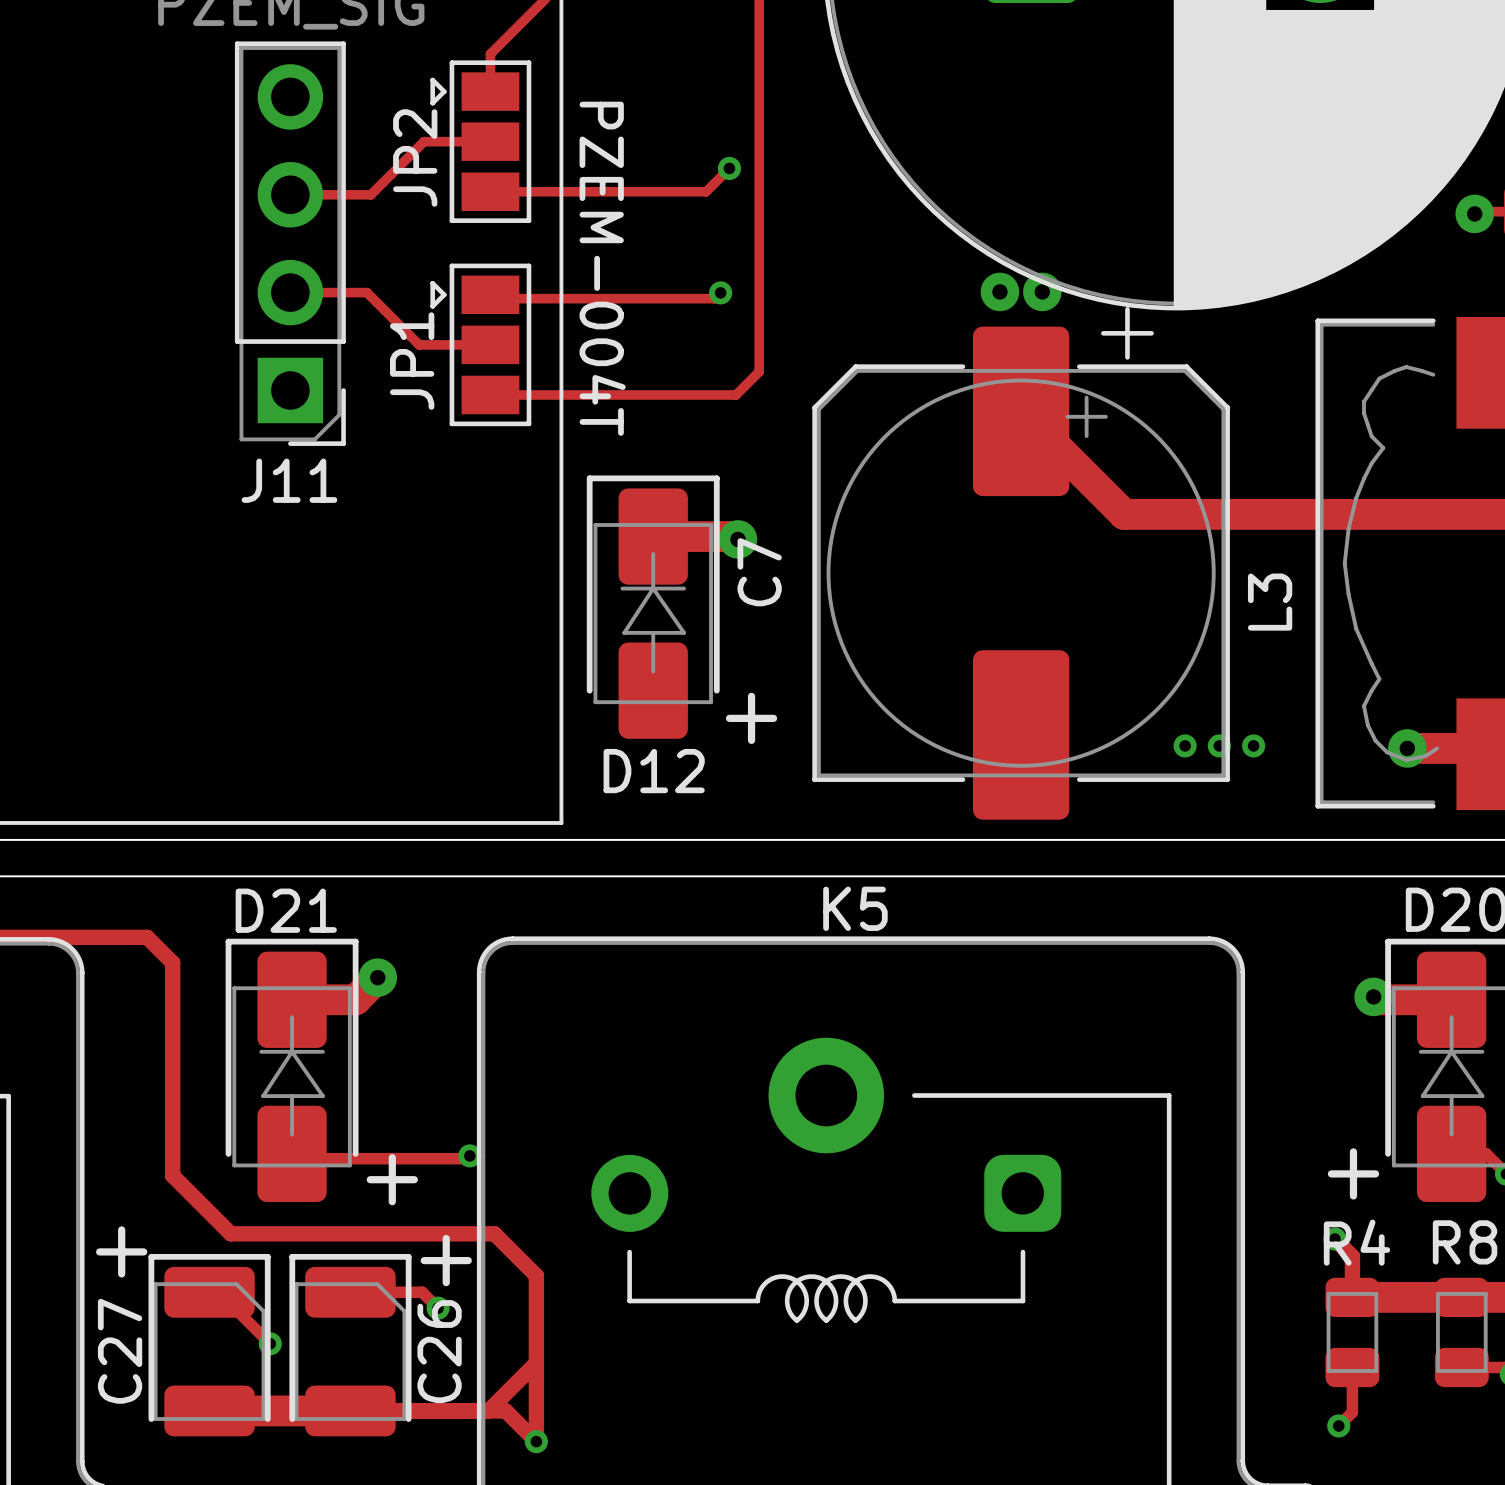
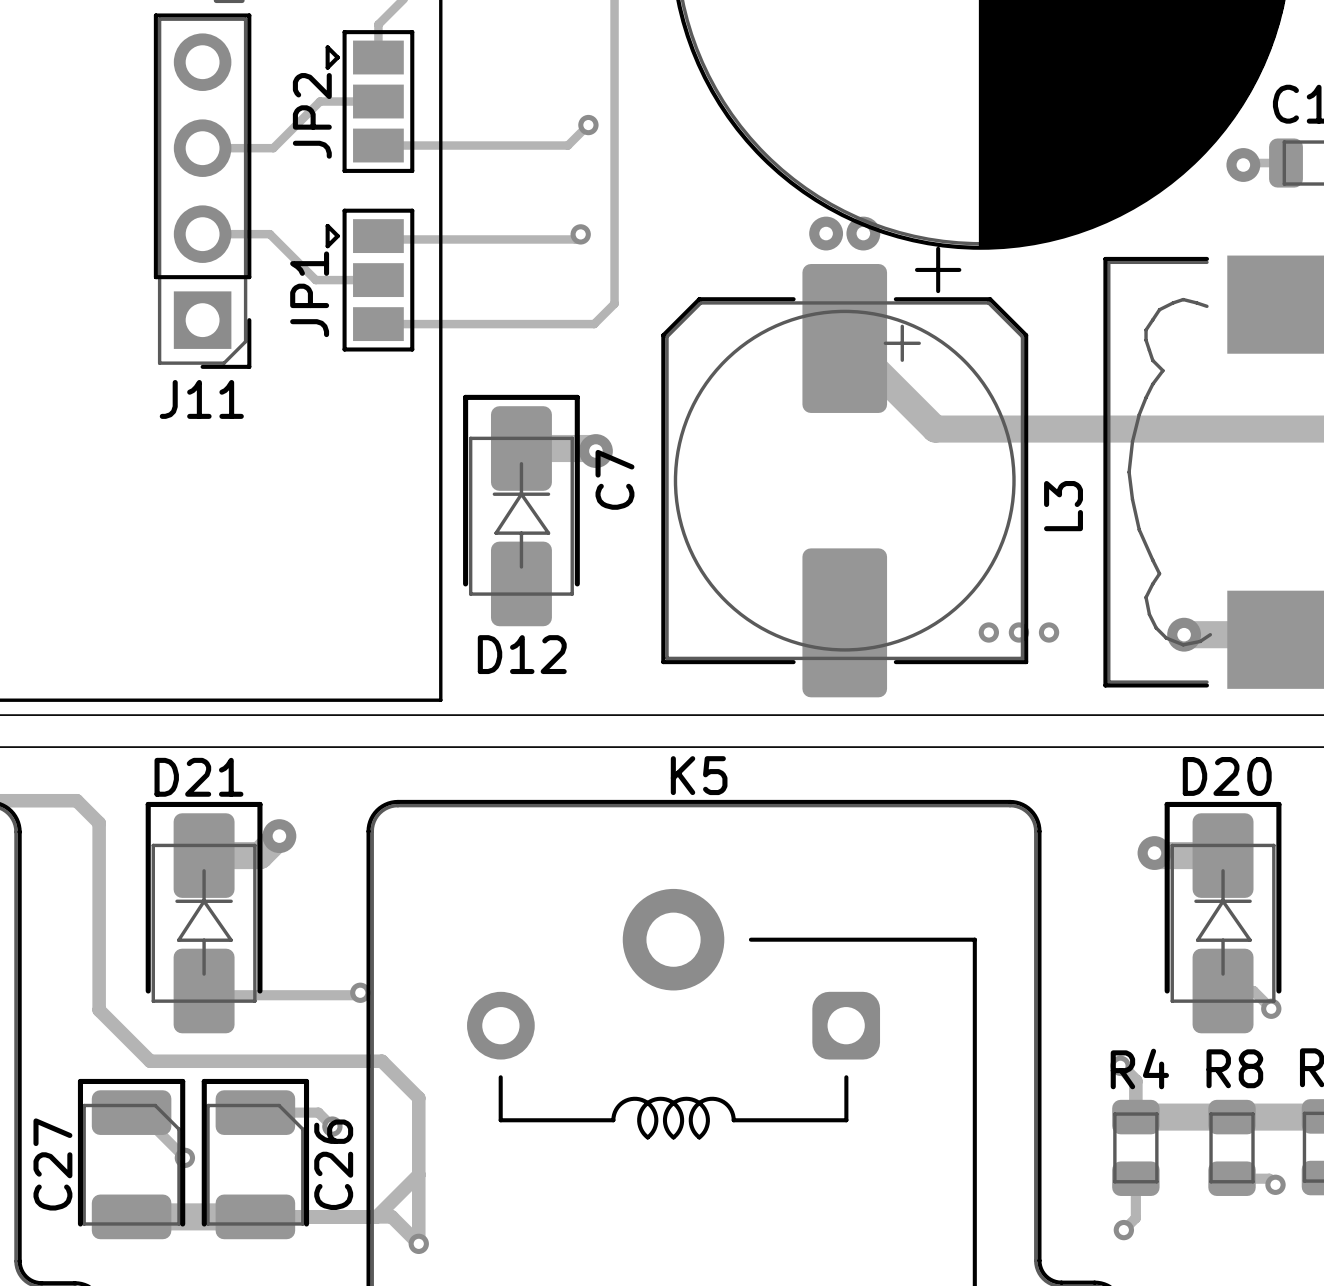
text: PZEM-004T (602, 268) -> none
text: + (751, 718) -> none
text: + (1353, 1173) -> none
text: + (392, 1179) -> none
text: + (121, 1251) -> none
text: + (446, 1260) -> none

